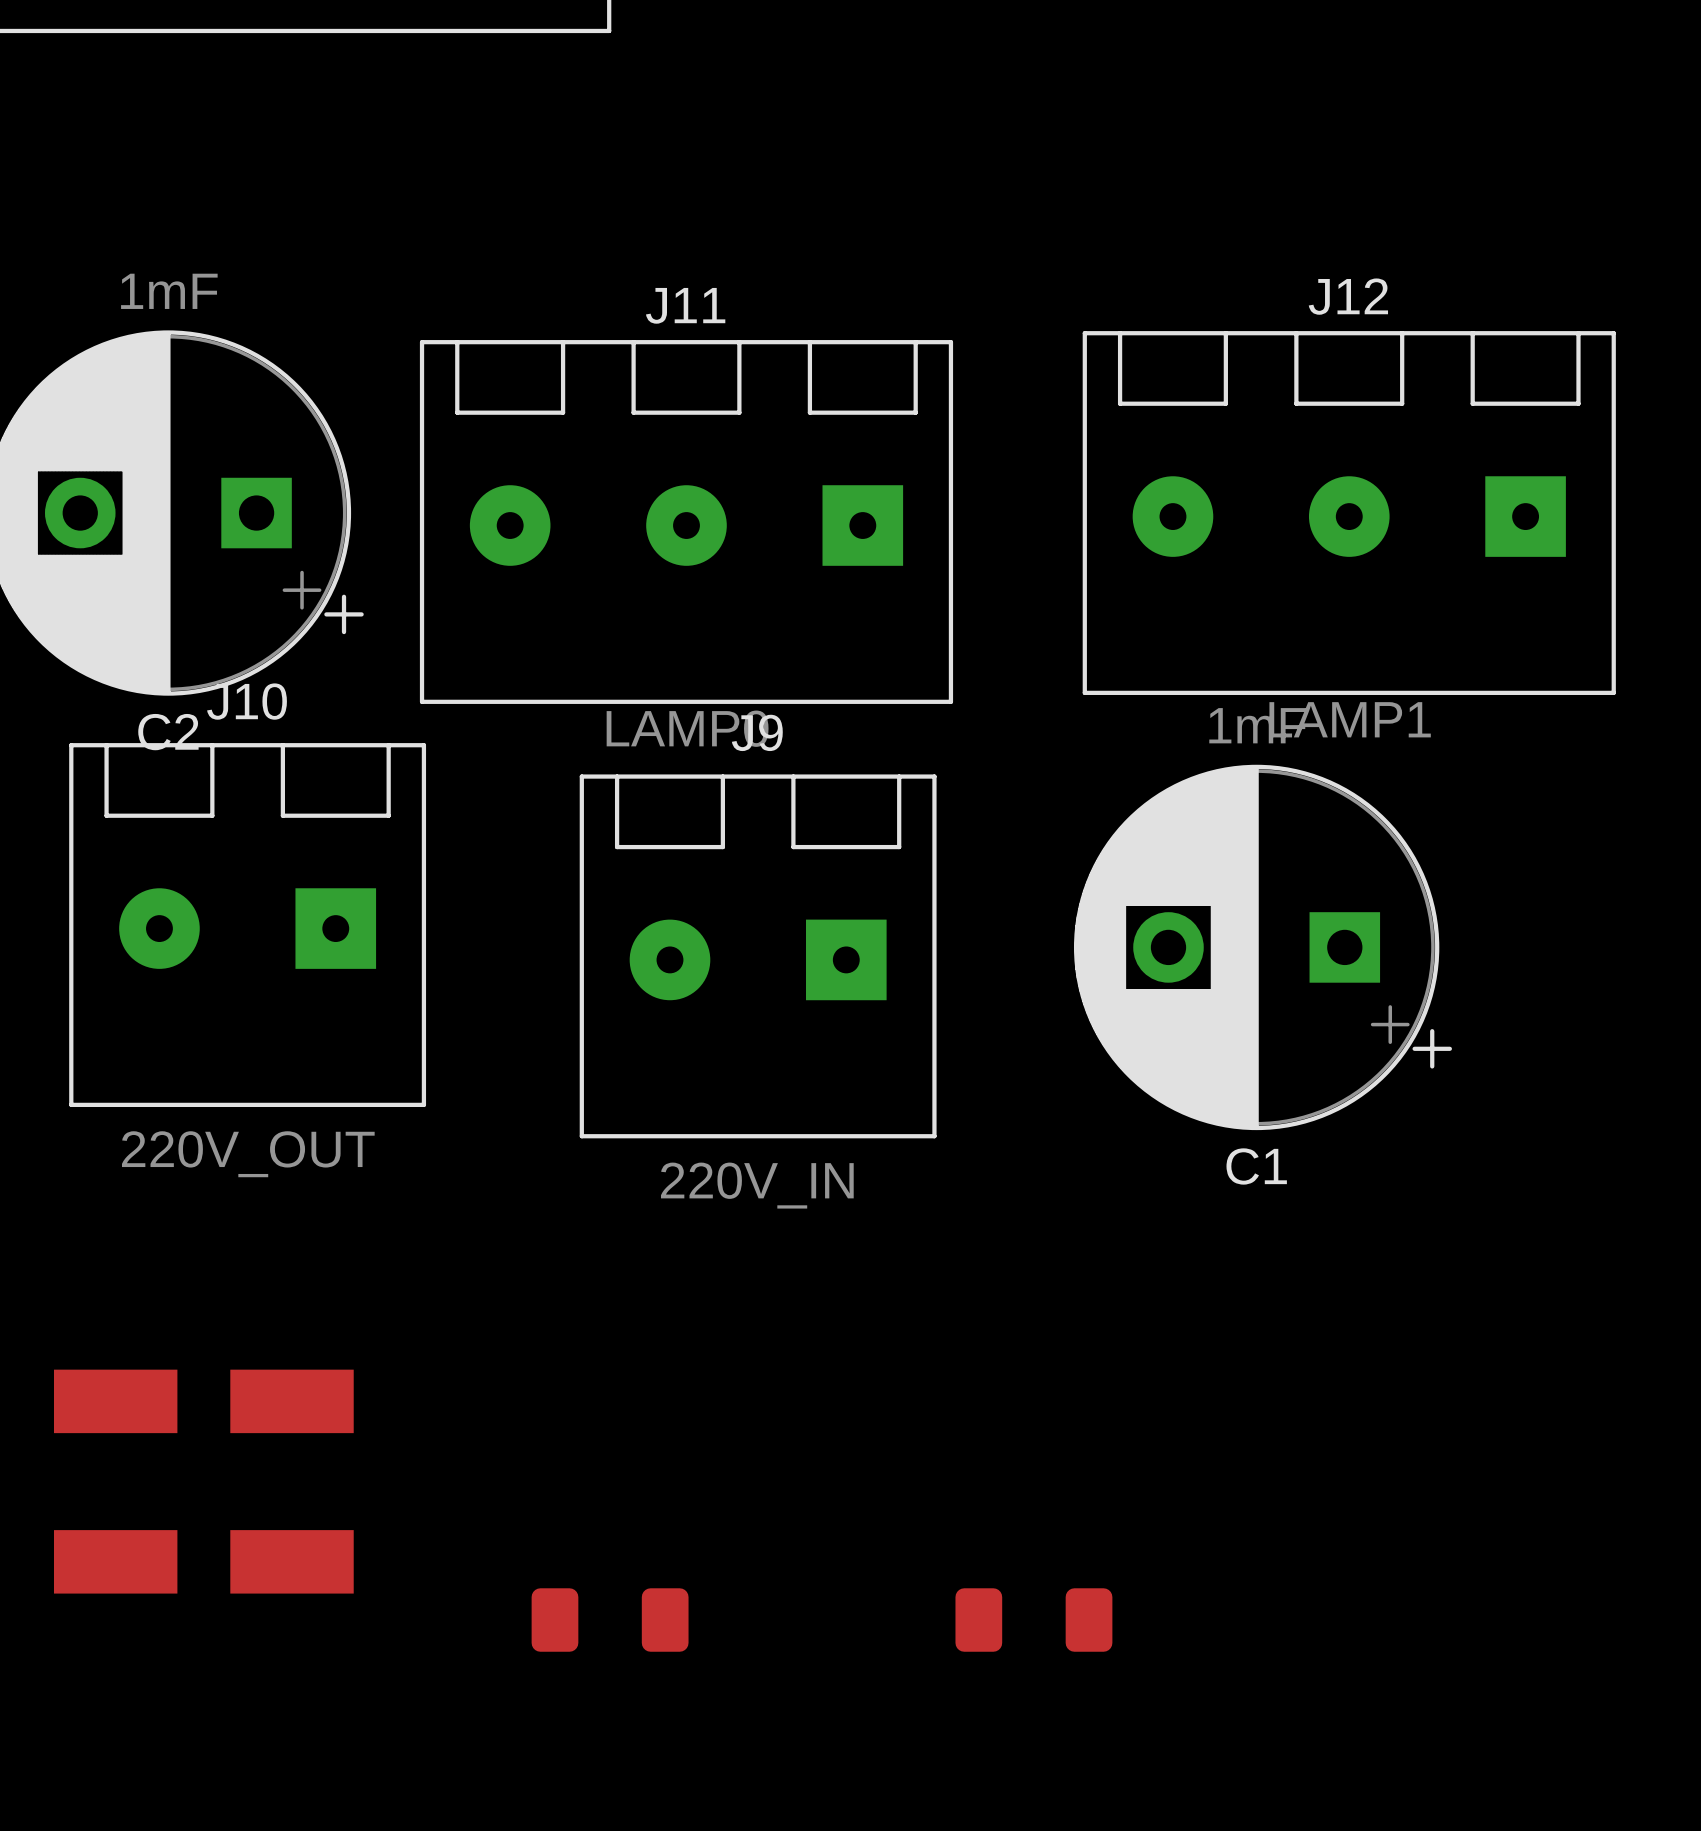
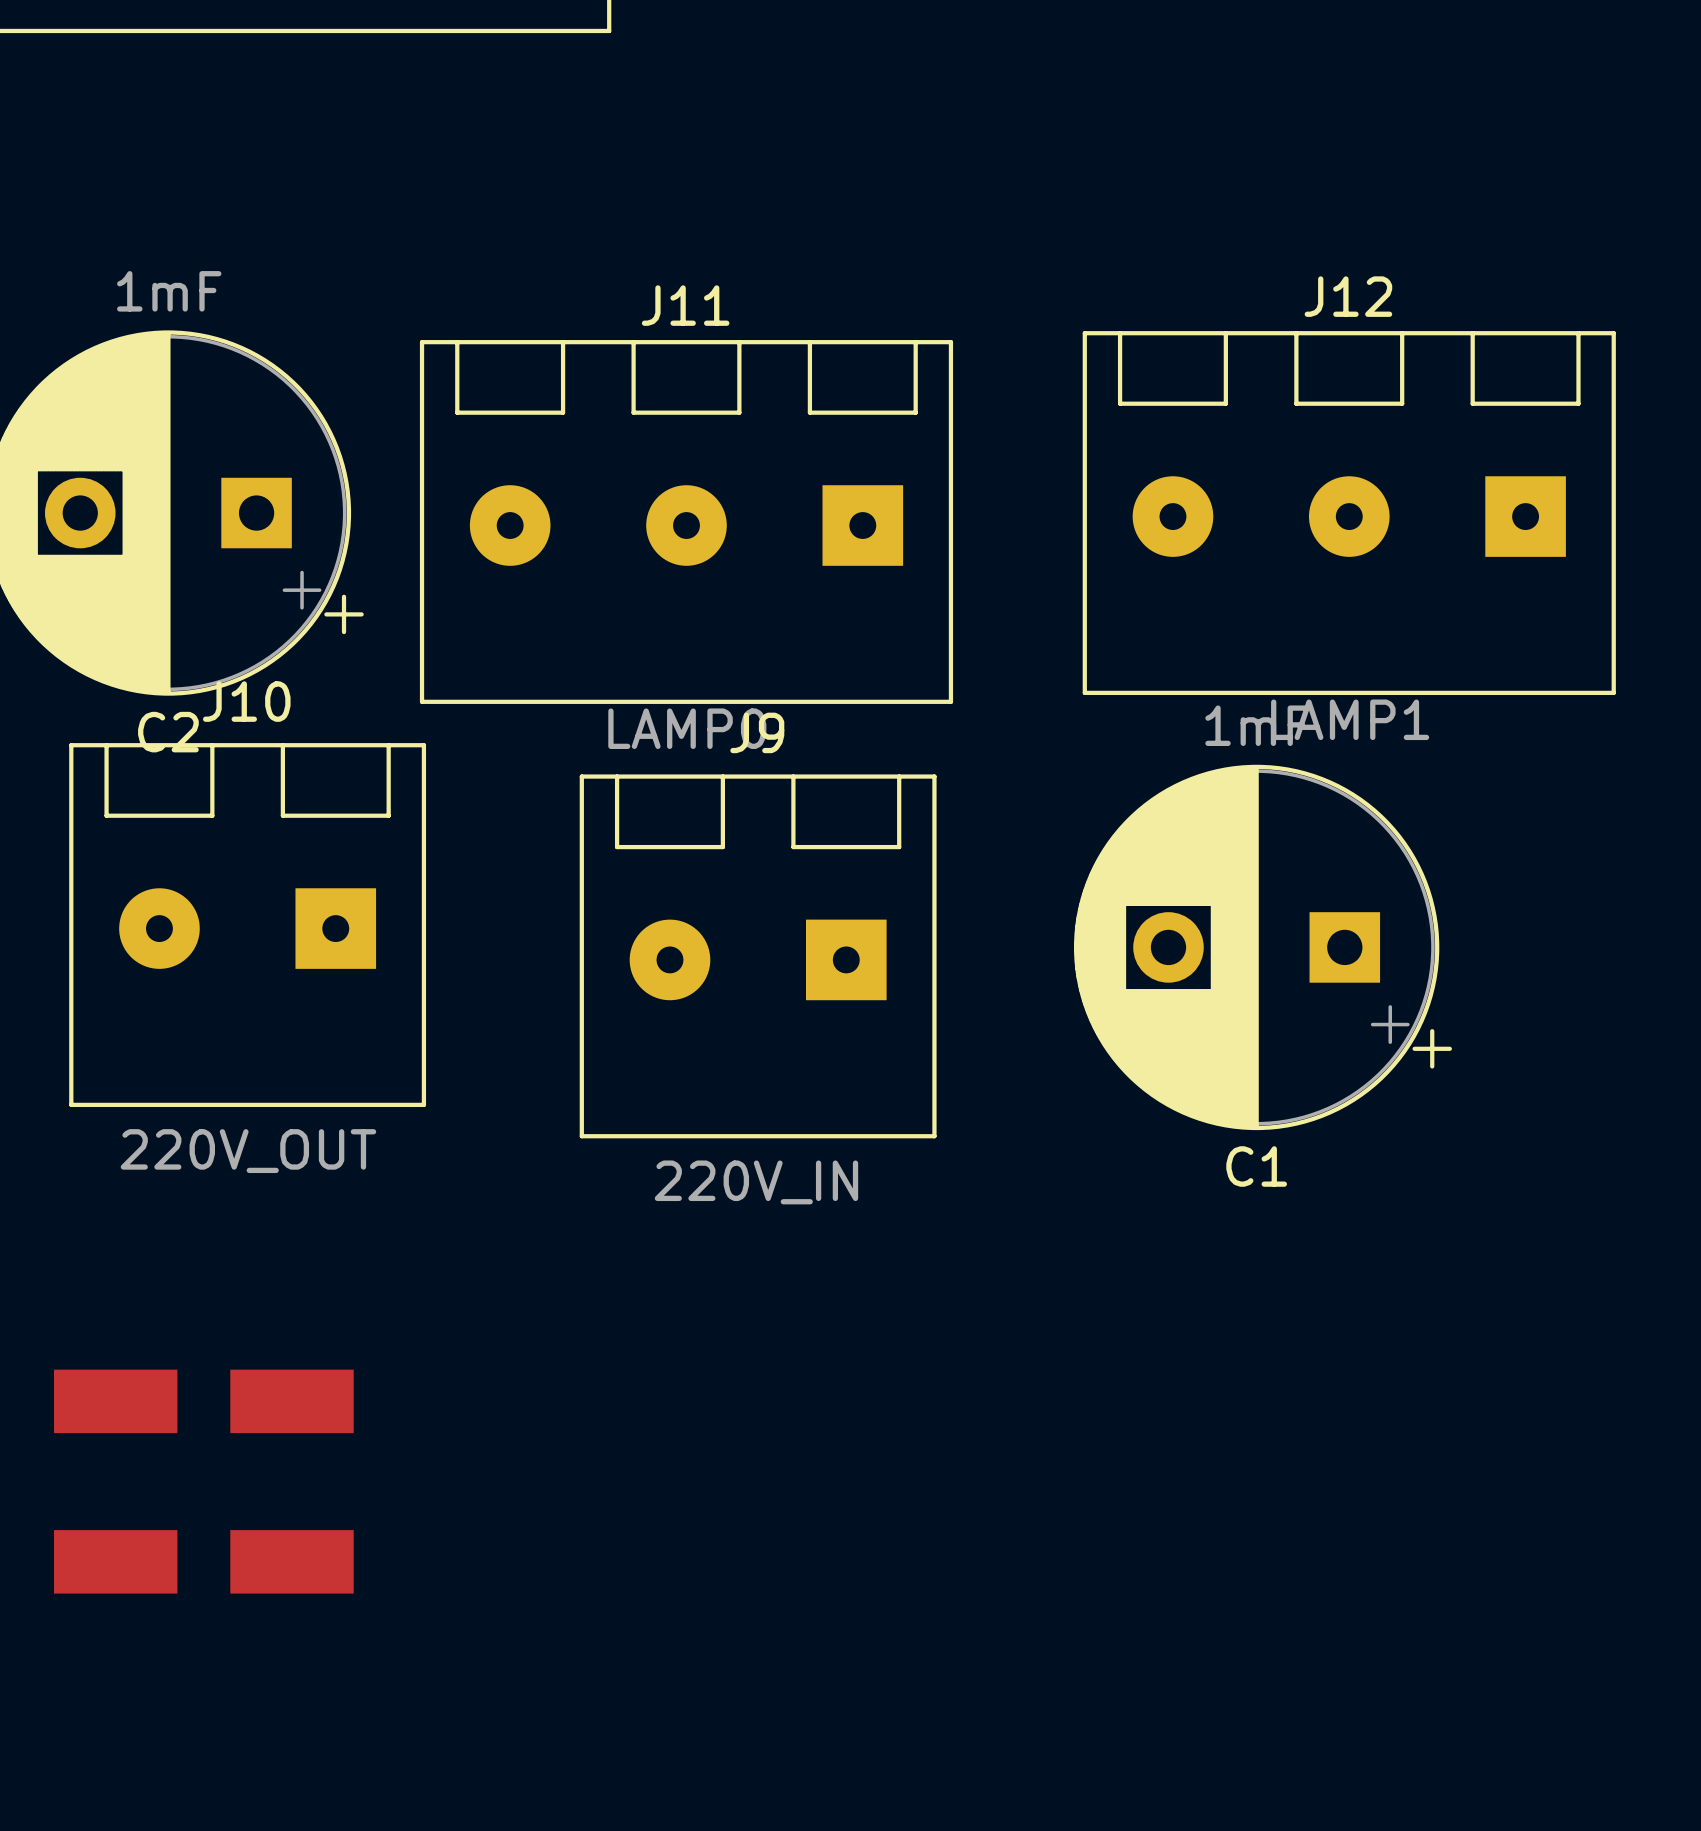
part: (610, 1620) -> none
part: (1033, 1620) -> none

